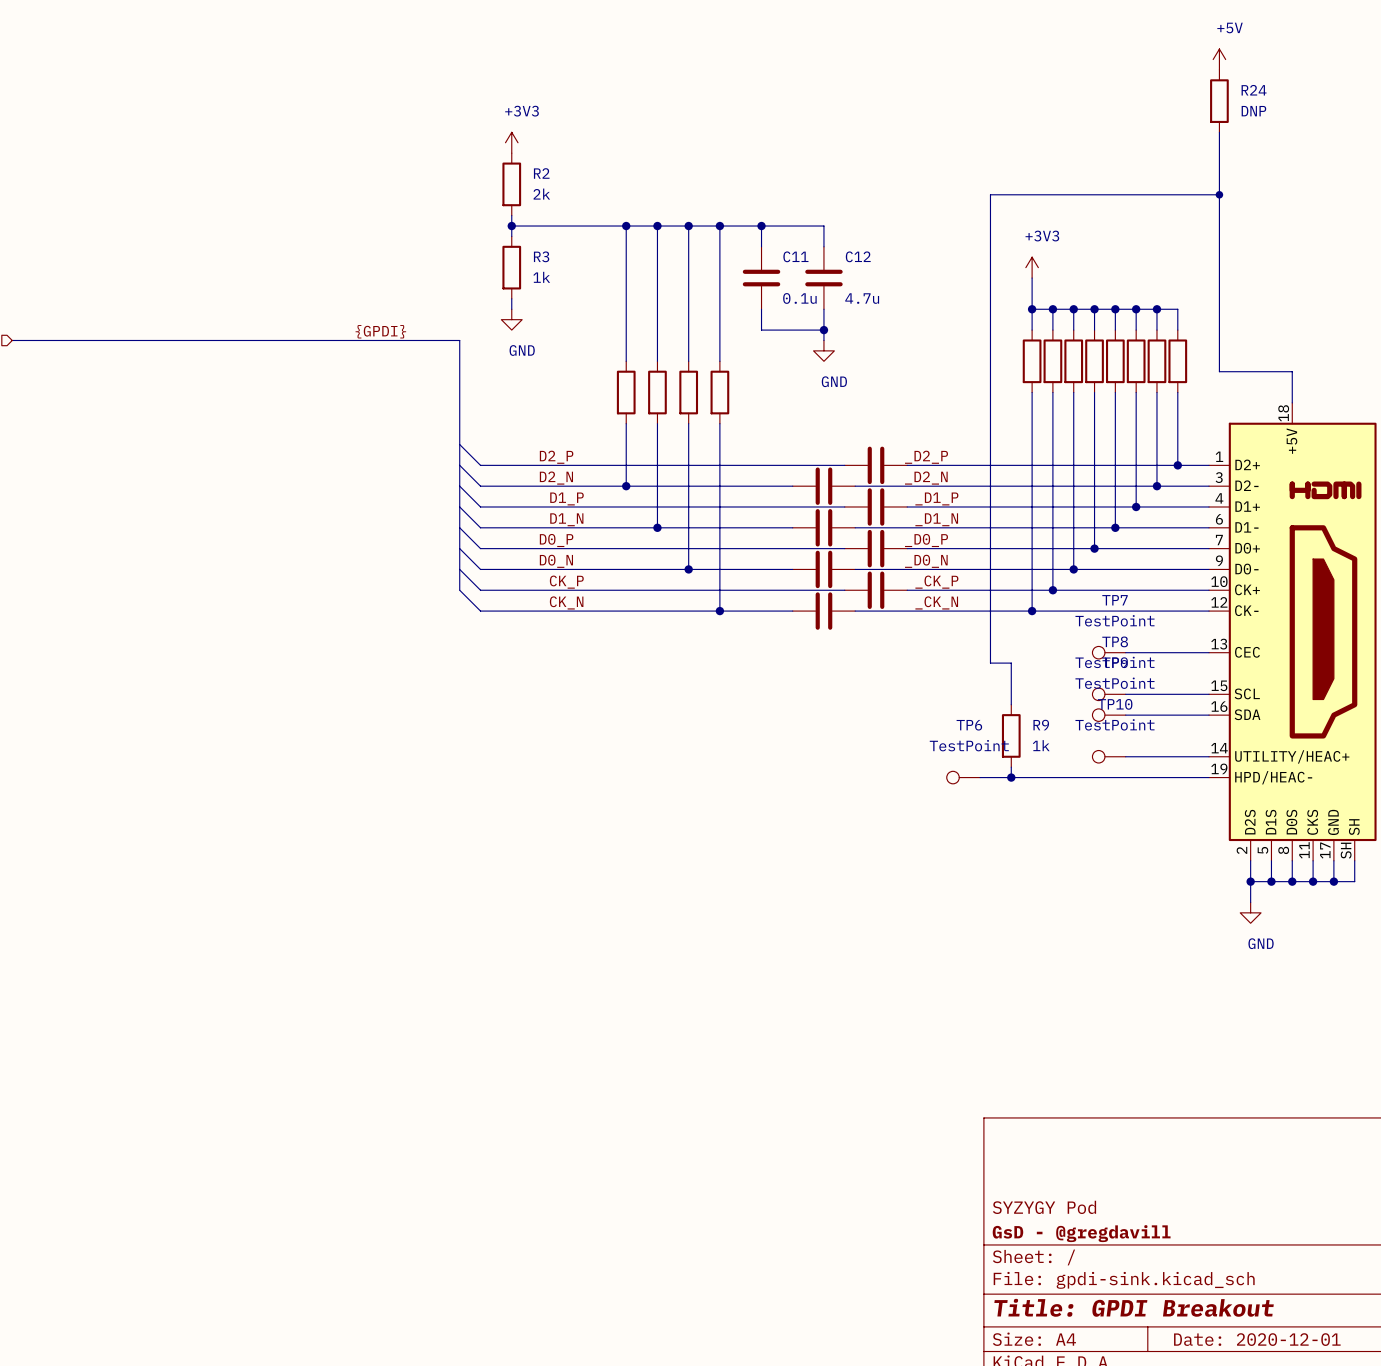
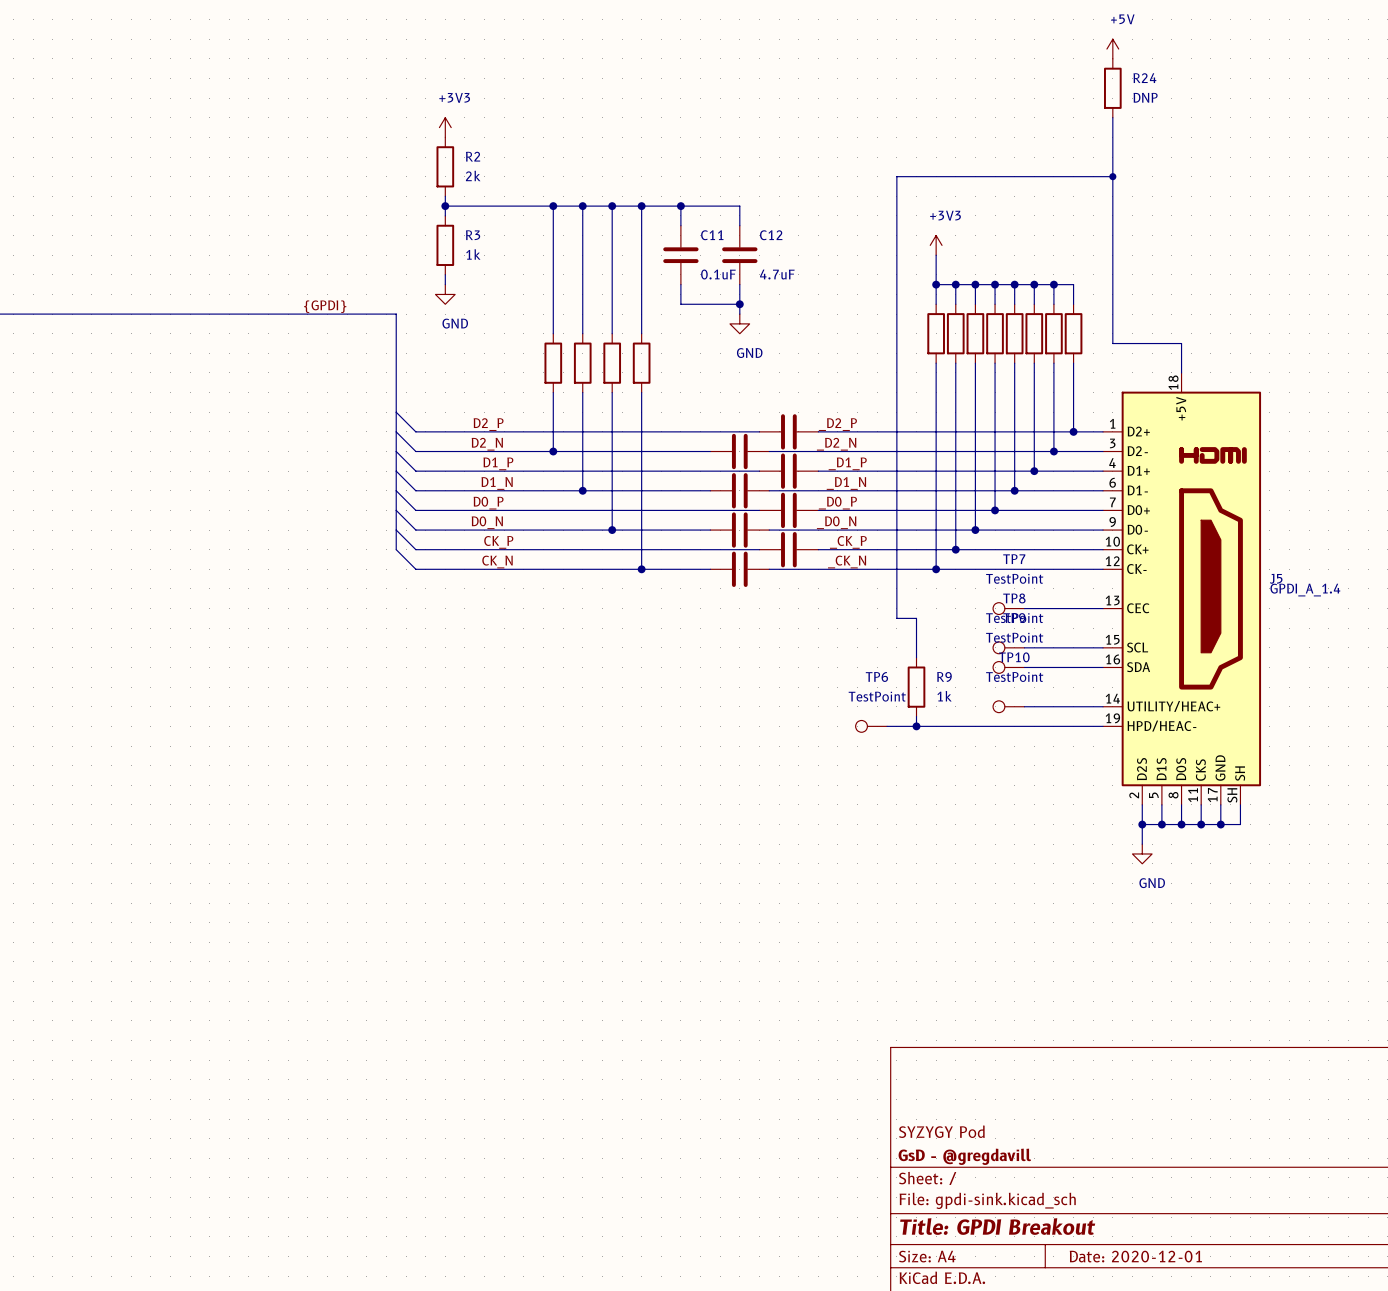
C11 value: 0.1u (799, 298) -> 0.1uF (718, 274)
C12 value: 4.7u (862, 298) -> 4.7uF (777, 274)

